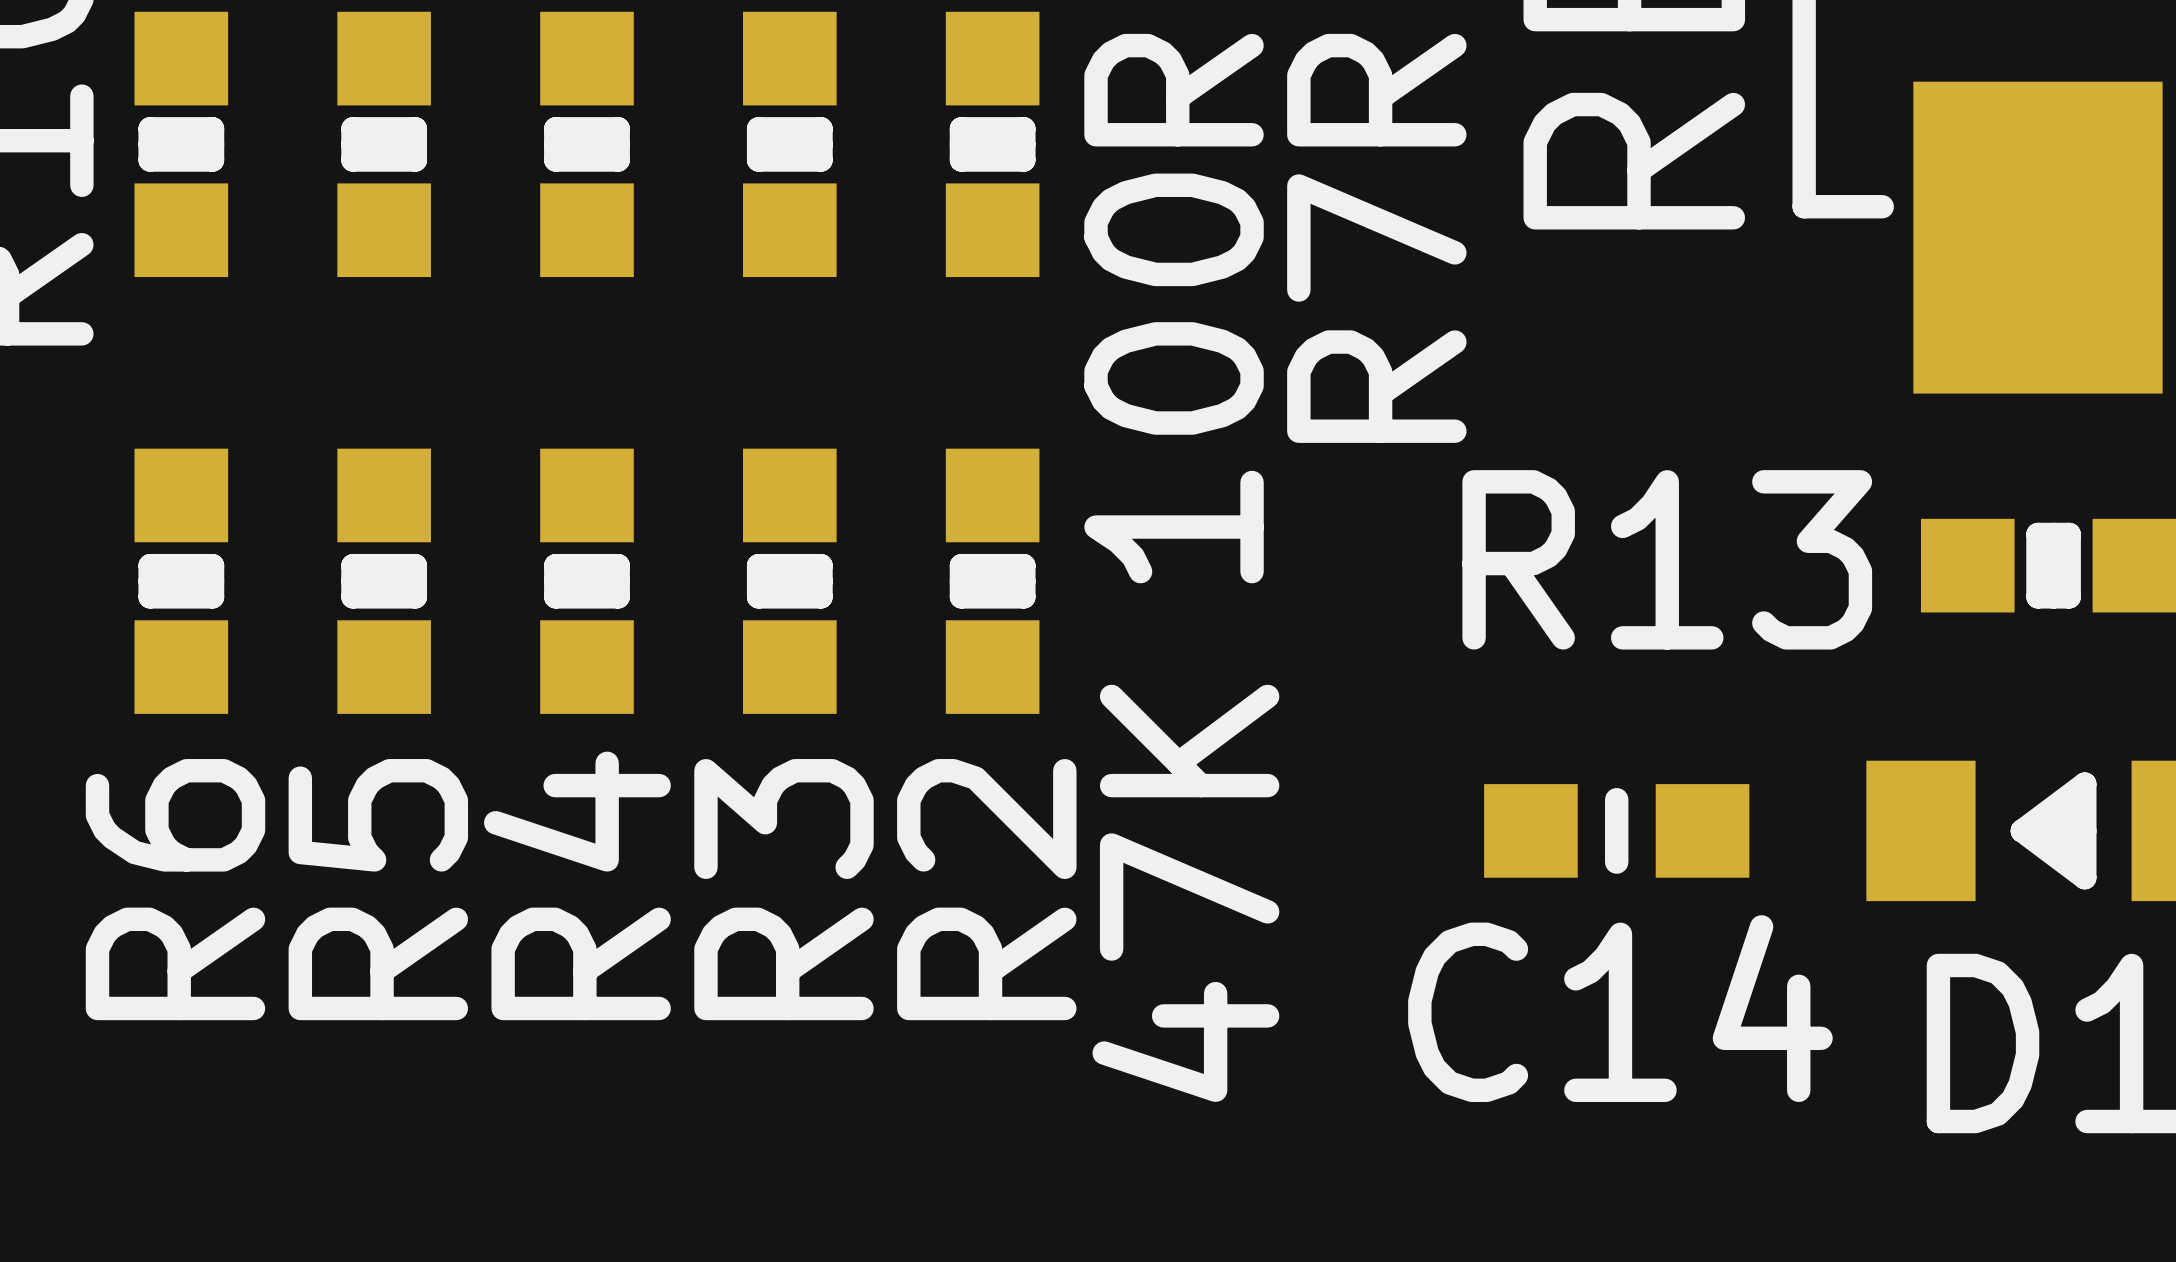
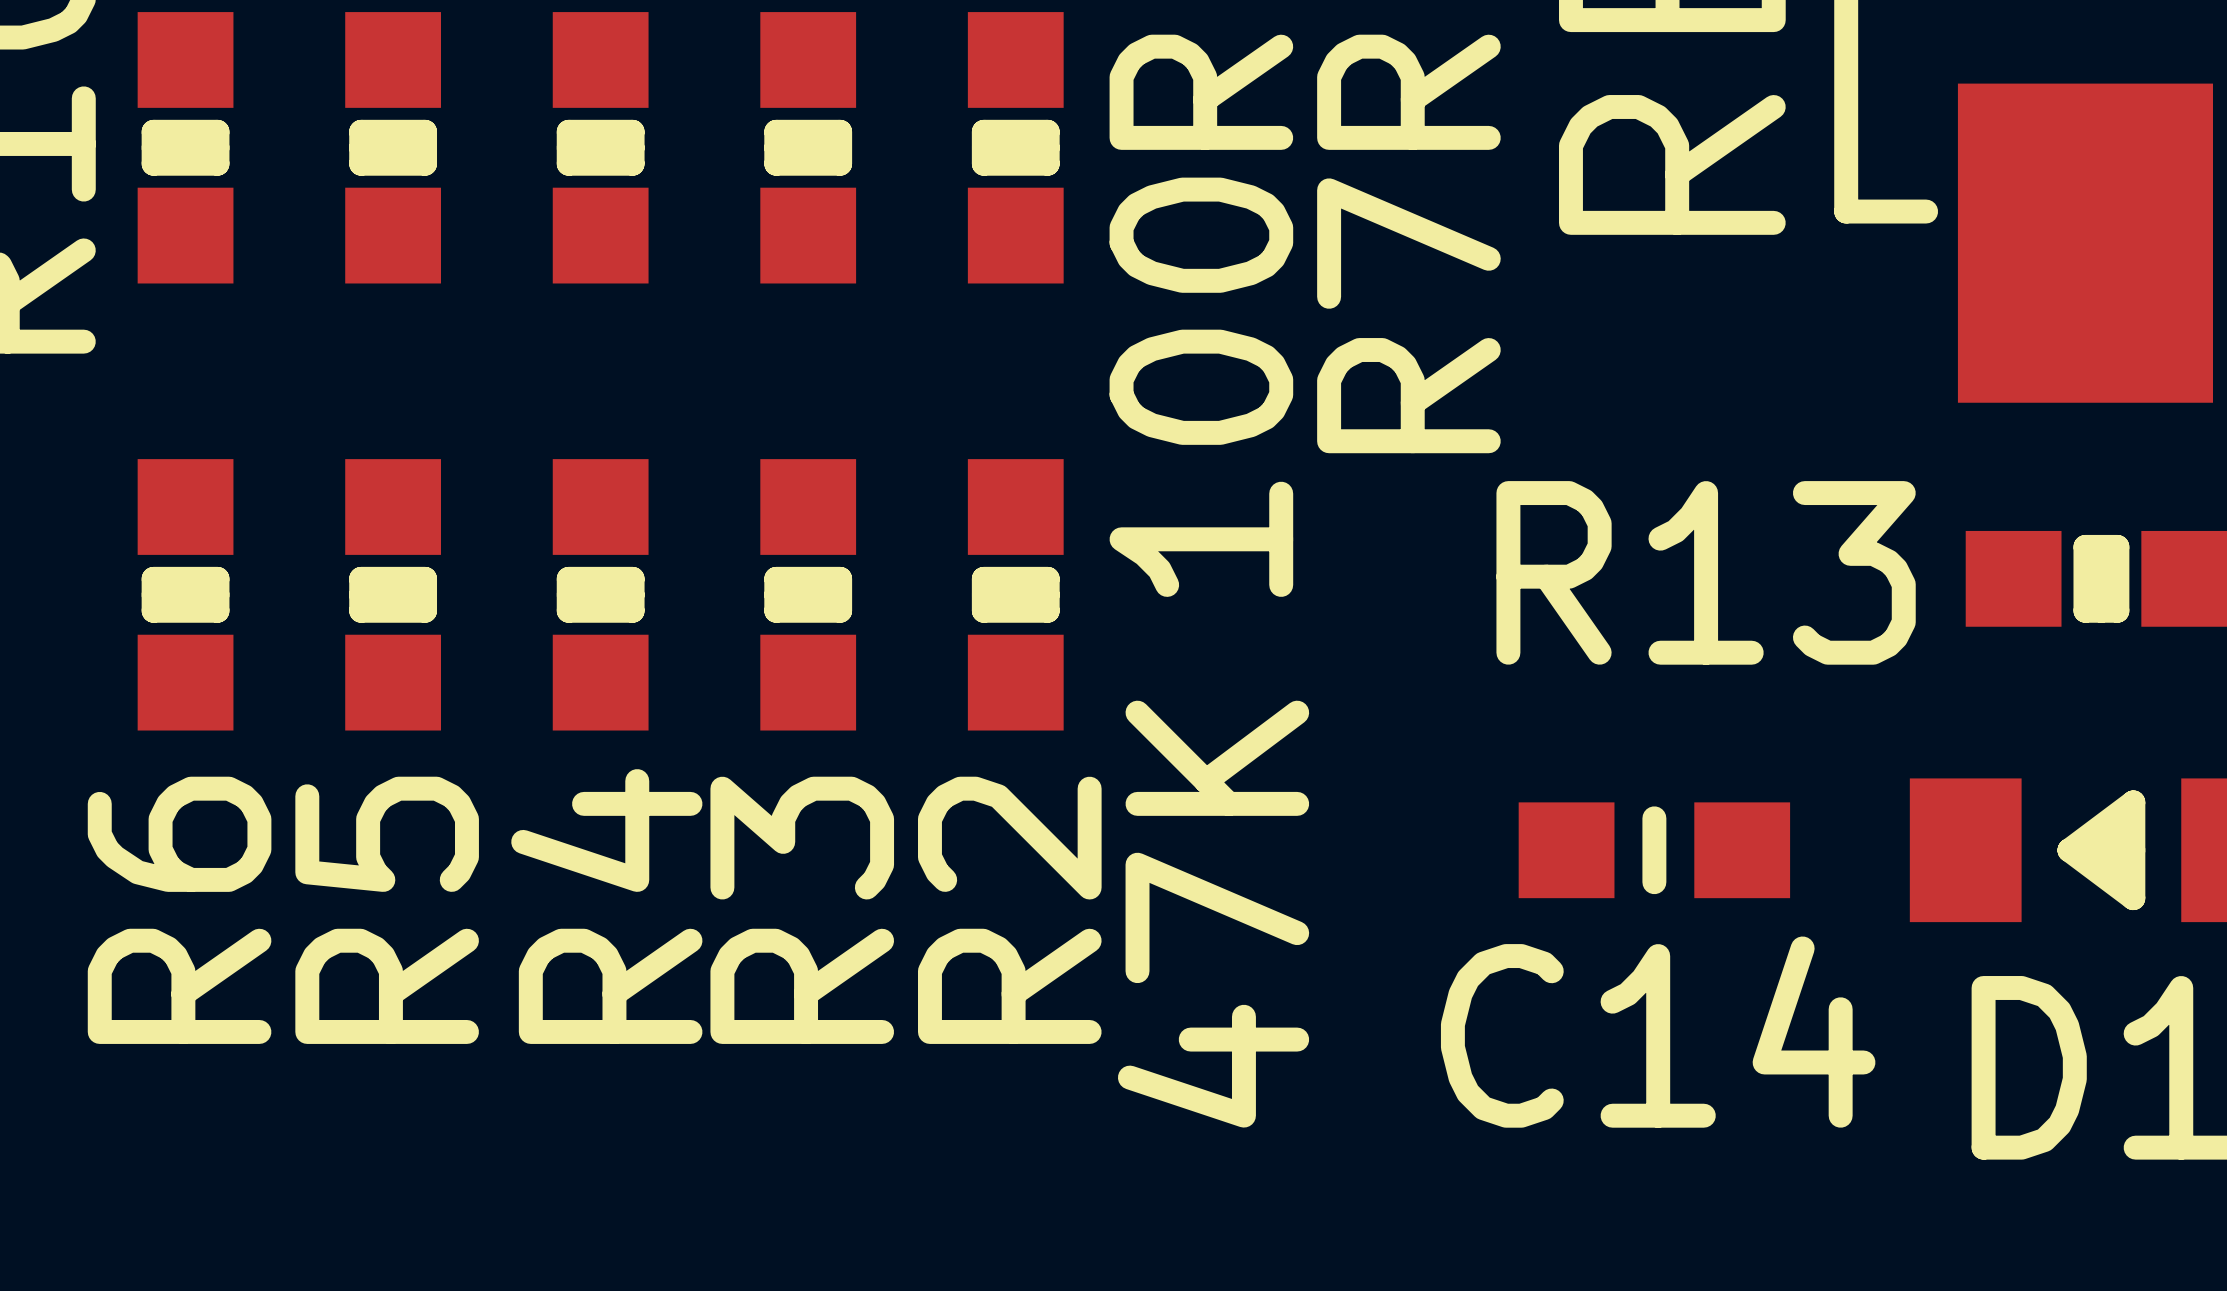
R4 name position: R4 (577, 885) -> R4 (606, 906)

